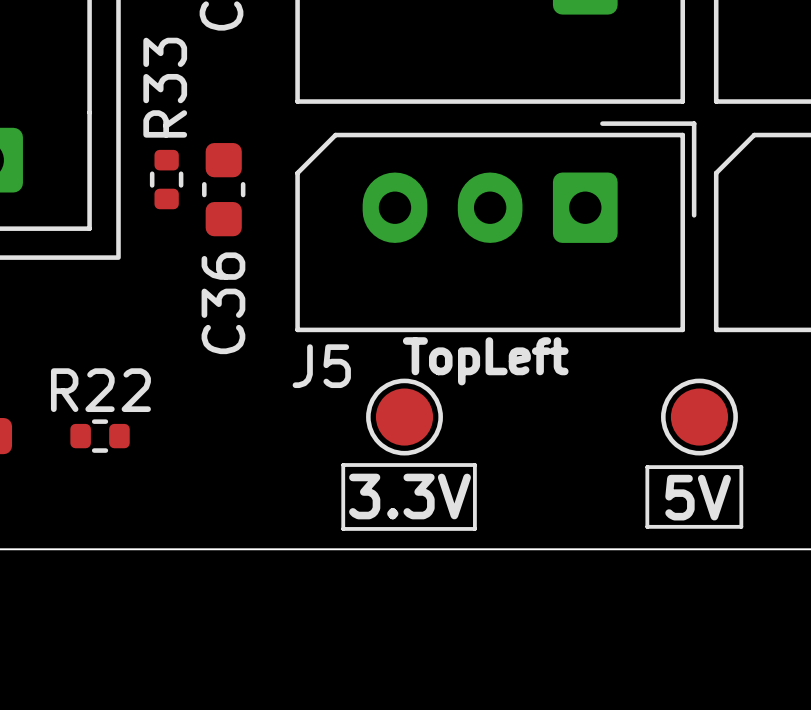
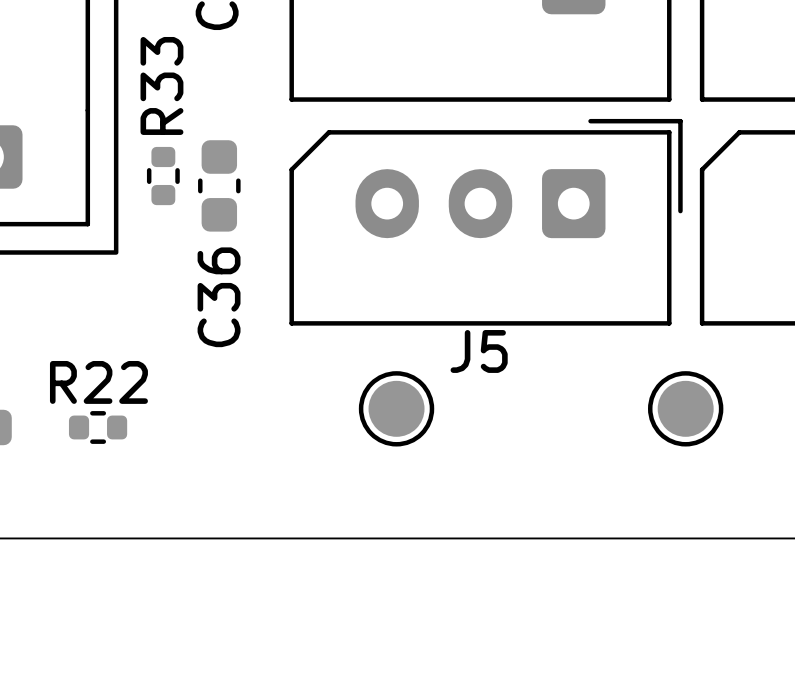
text: TopLeft (485, 361) -> none
J5 name position: J5 (321, 366) -> J5 (479, 351)
line: (343, 465) (474, 465) (474, 528) (343, 528) (343, 465) -> none
line: (647, 467) (741, 467) (741, 526) (647, 526) (647, 467) -> none
text: 3.3V (410, 496) -> none
text: 5V (698, 497) -> none

